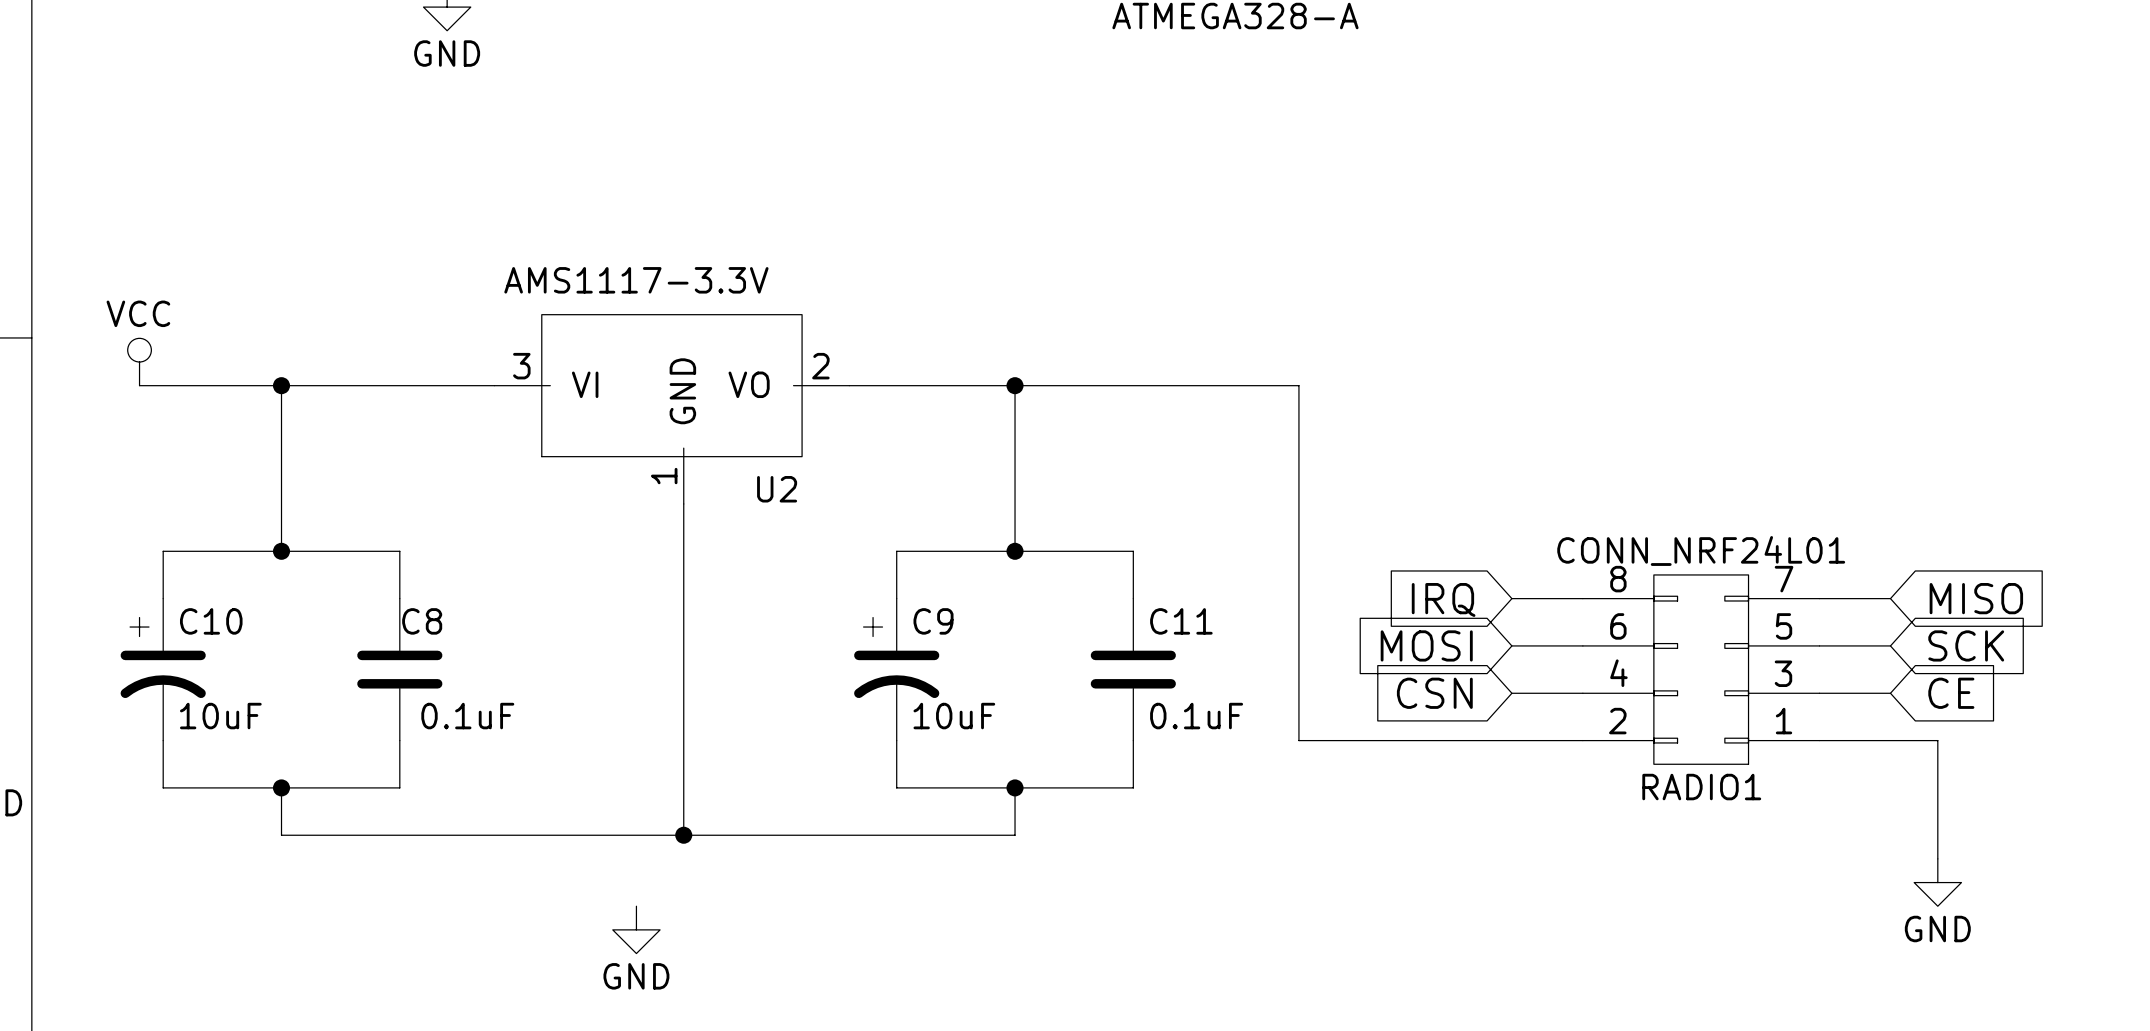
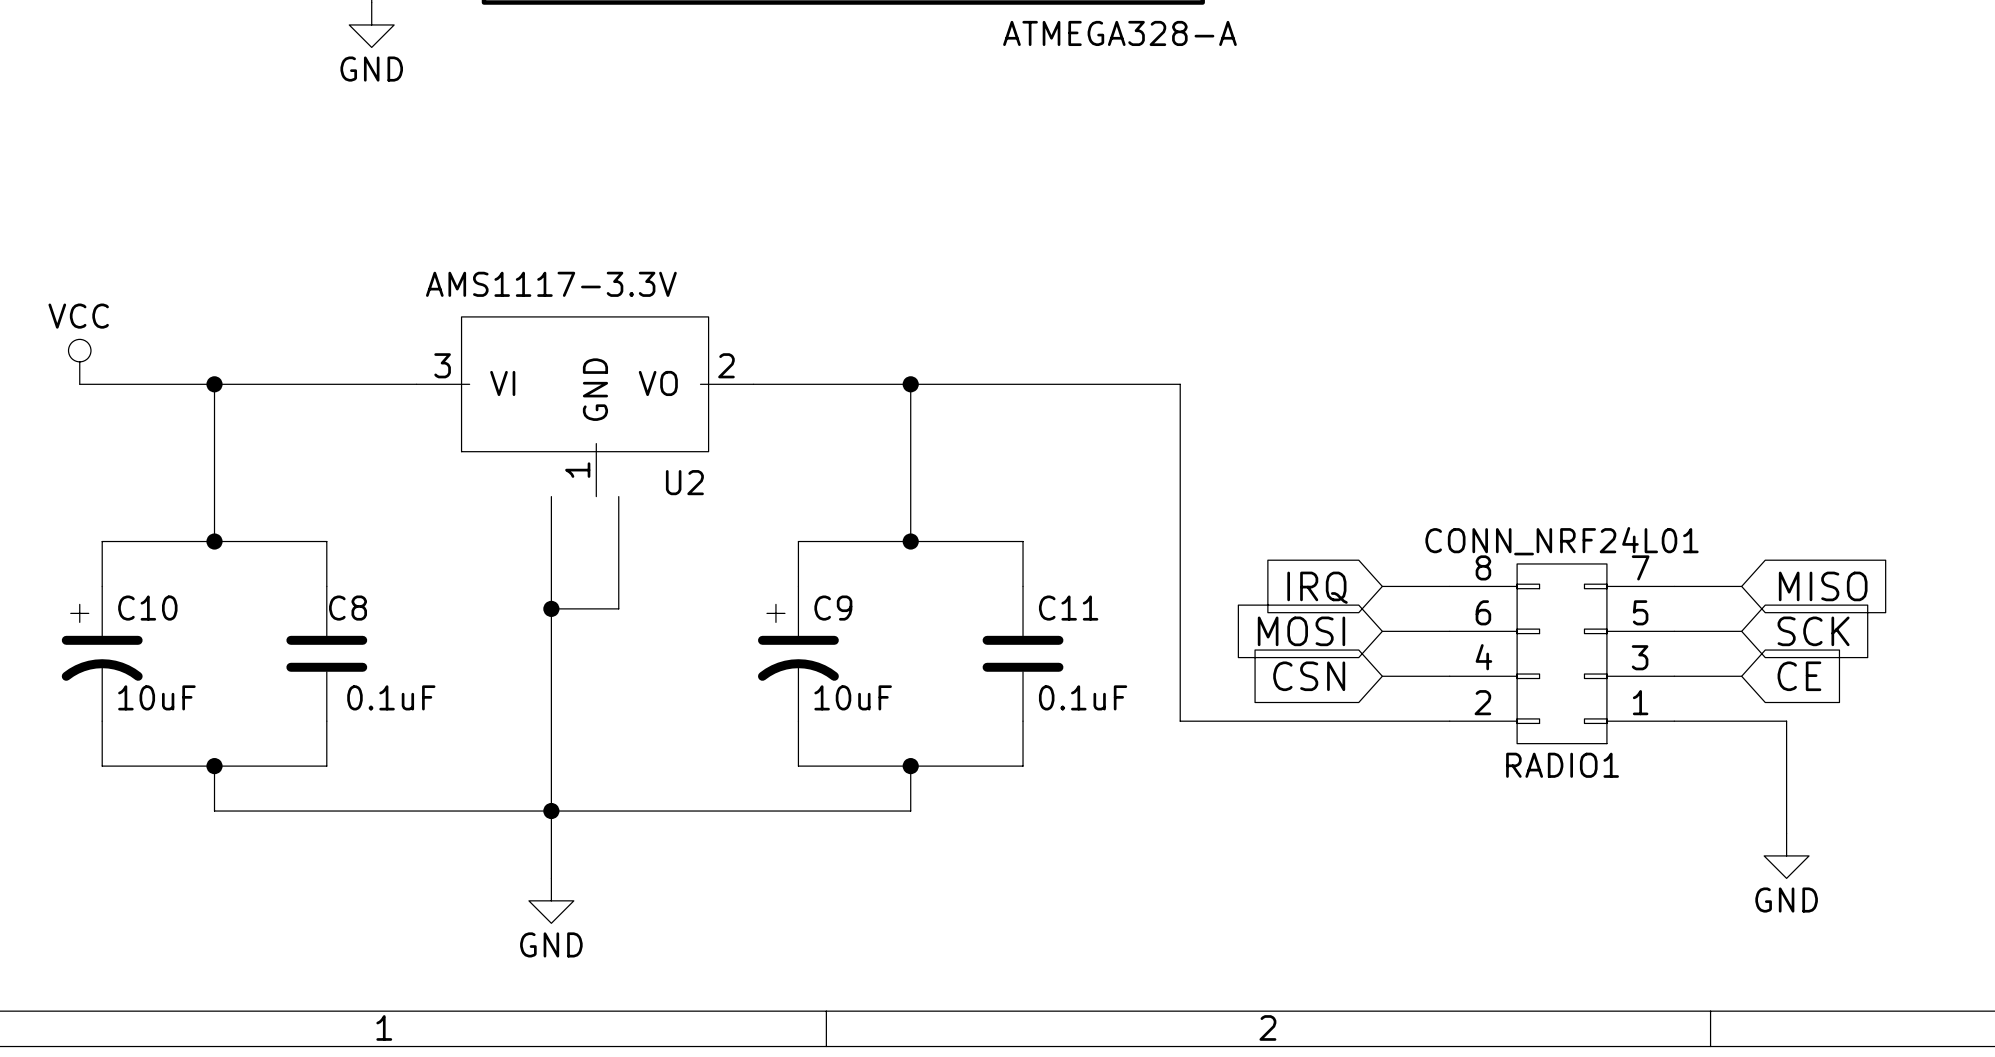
wire: none -> (551, 496) (551, 878)
wire: (683, 503) (683, 835) -> none
wire: none -> (618, 496) (618, 608) (551, 608)
junction: none -> (551, 608)
junction position: (683, 835) -> (551, 811)

